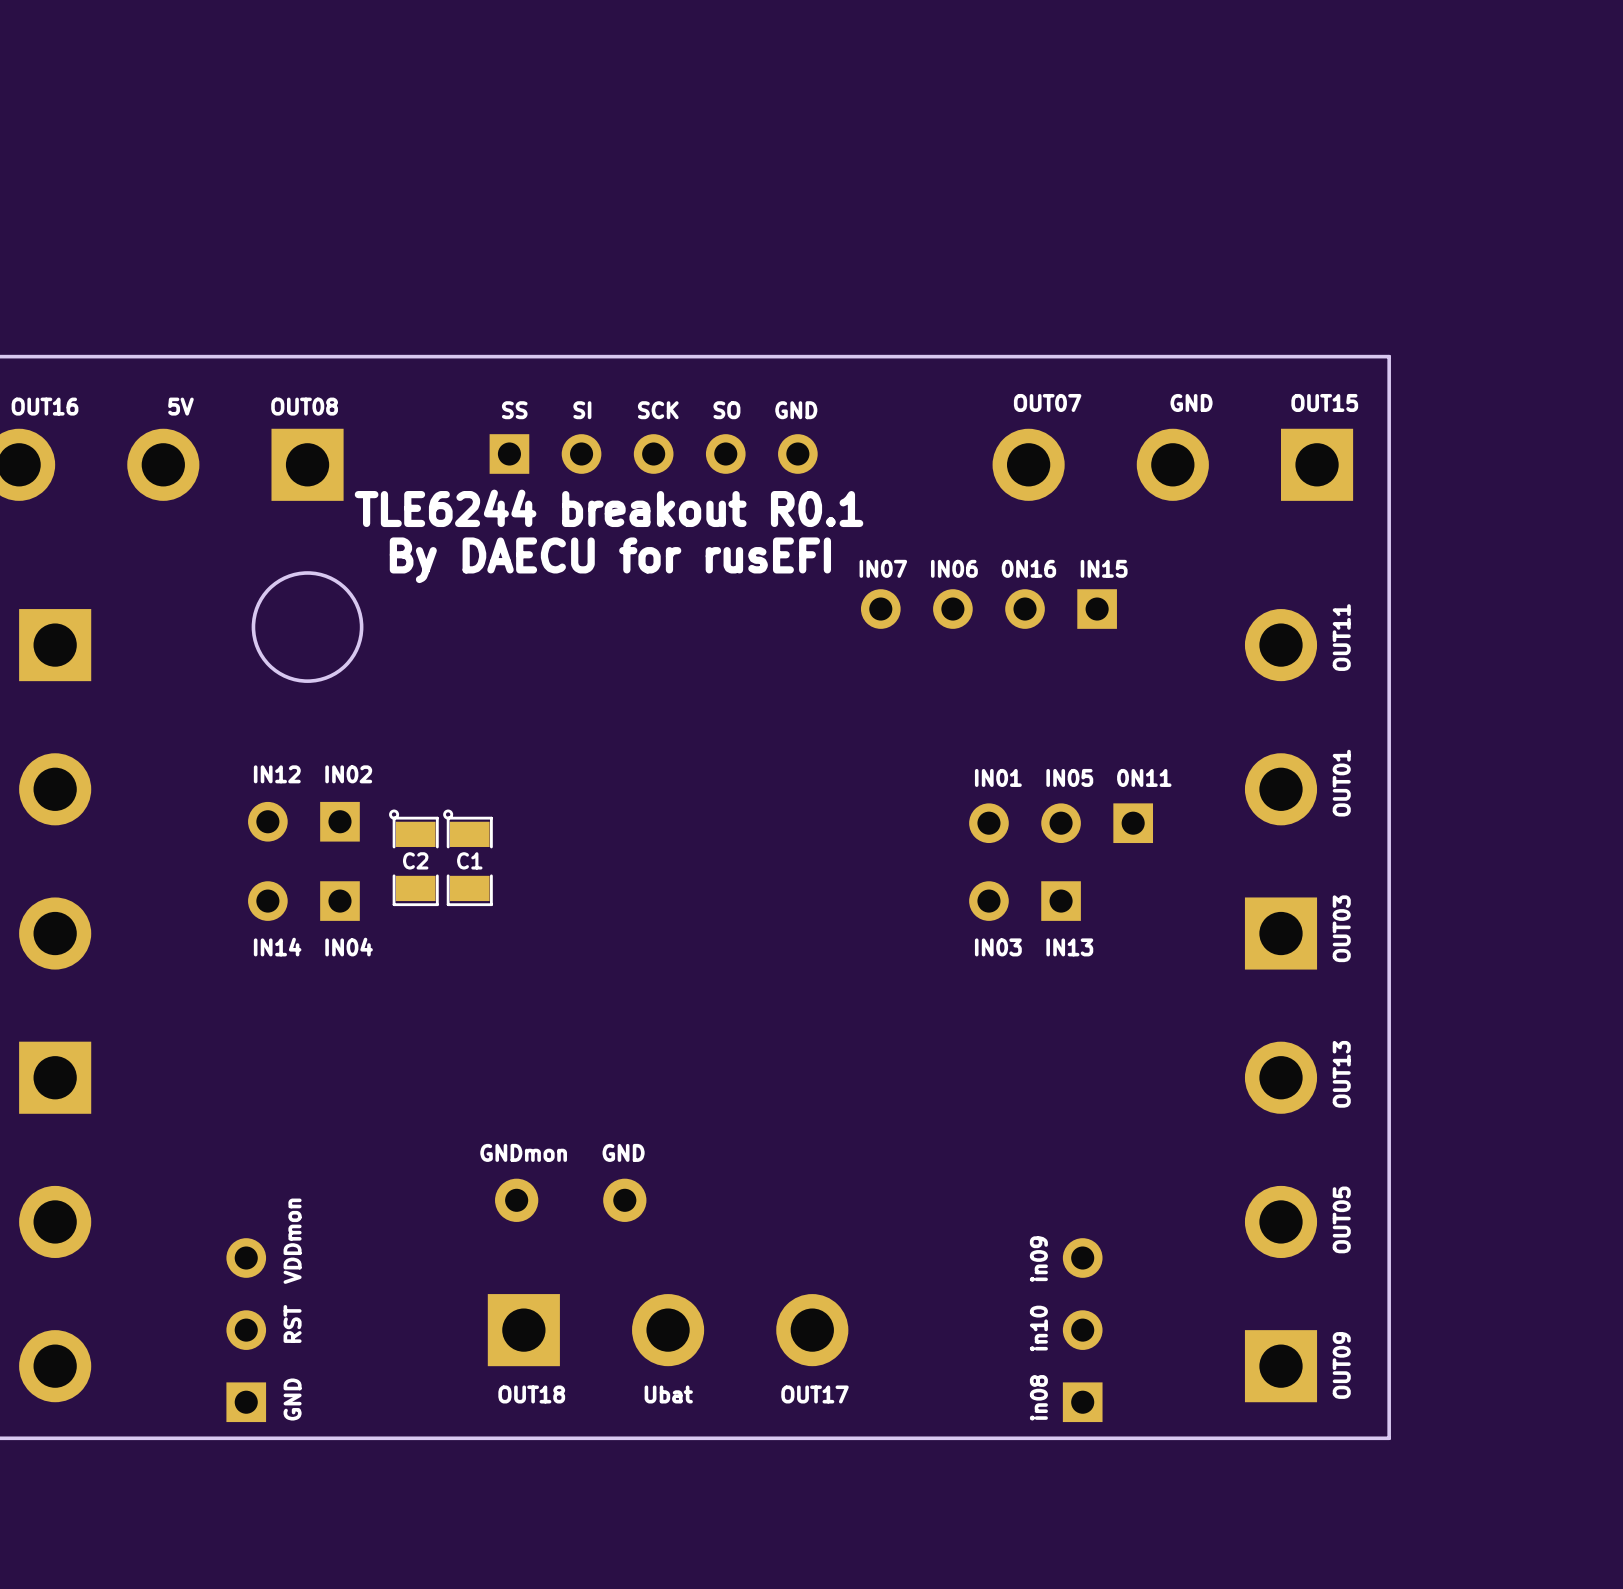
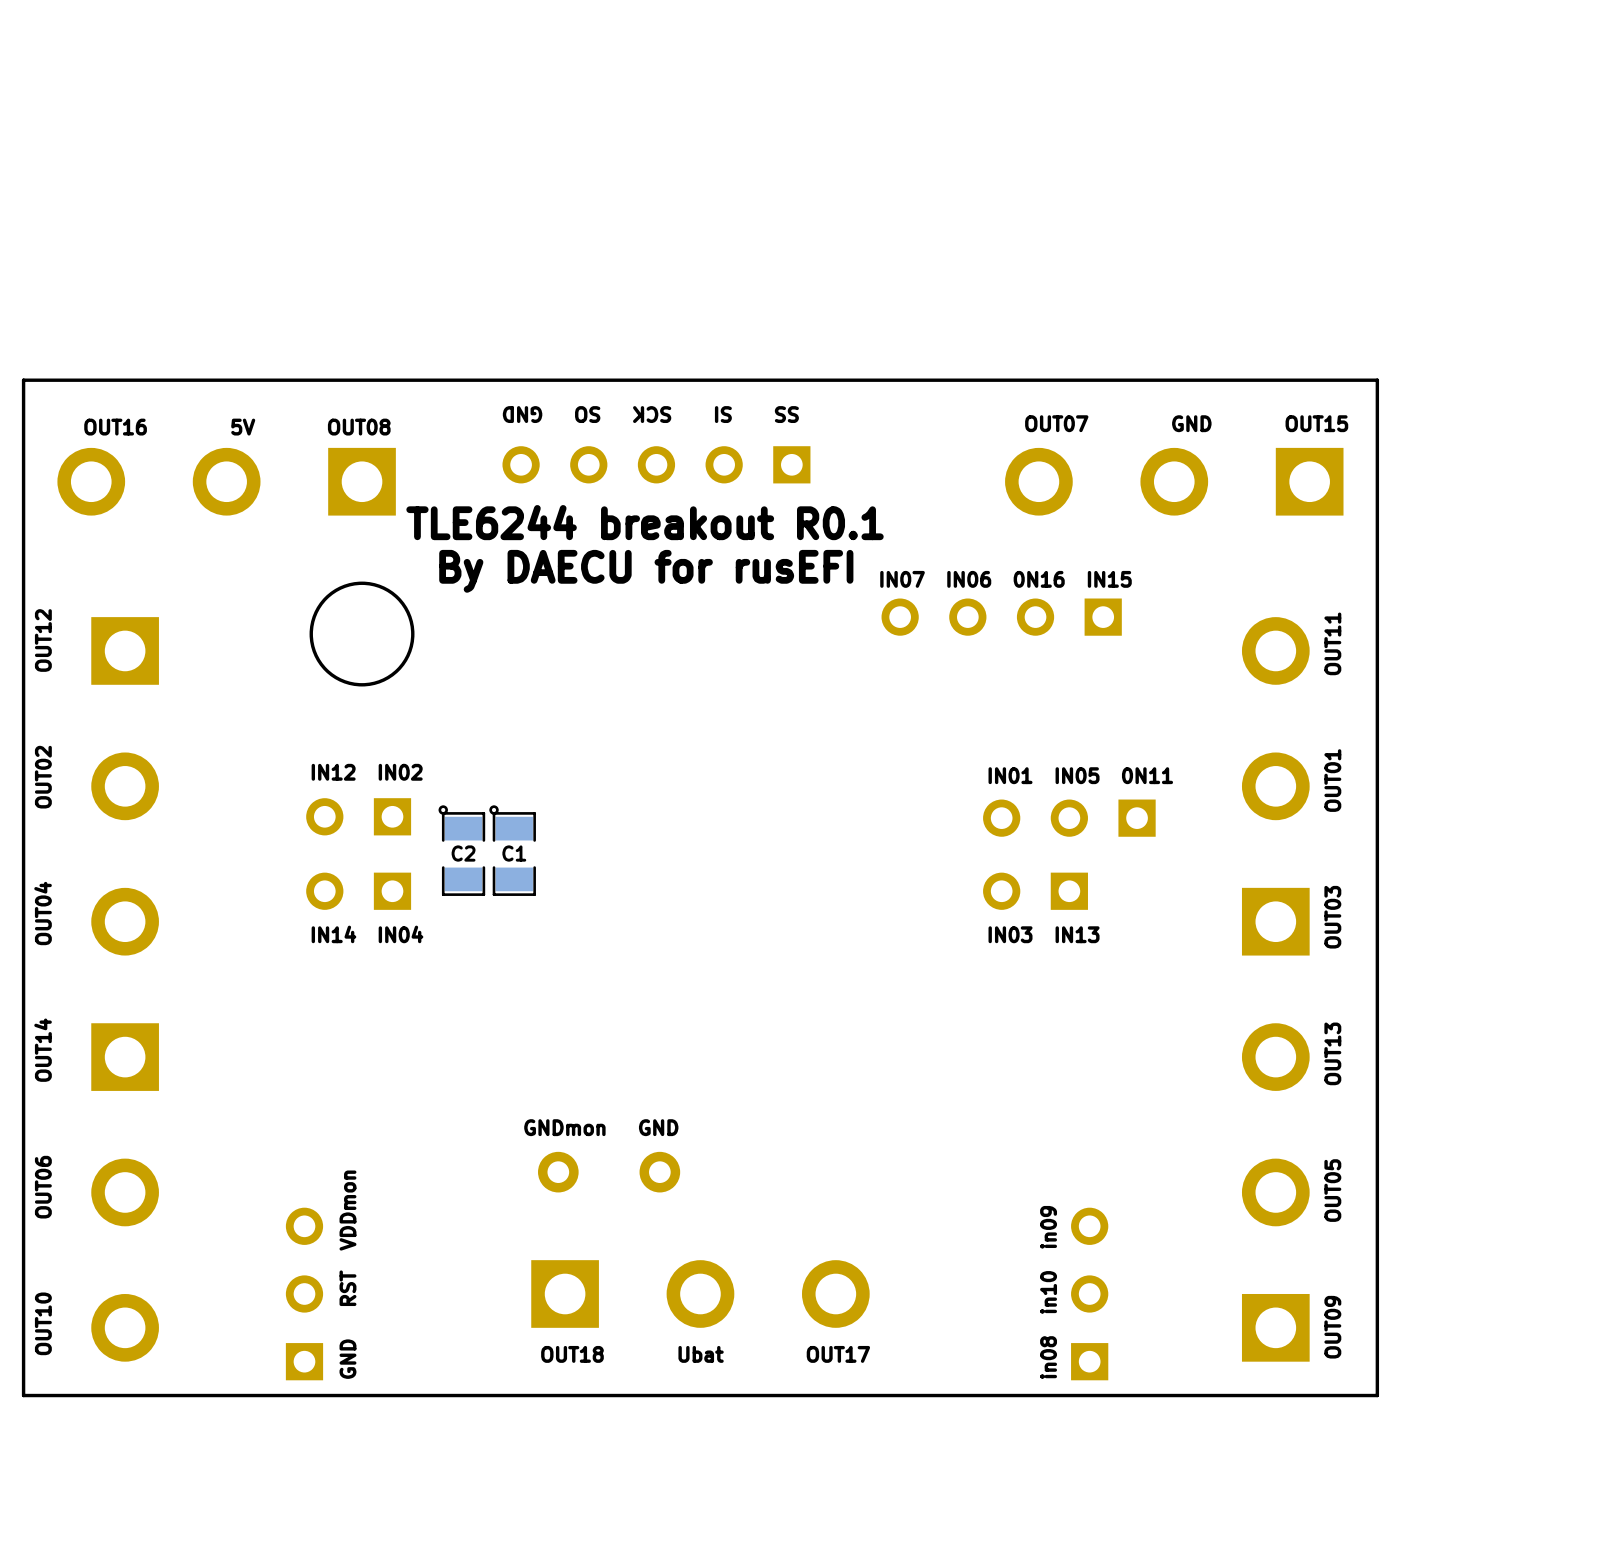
text rotation: 0° (659, 410) -> 180° (650, 414)
part rotation: 0° (653, 454) -> 180° (656, 464)

